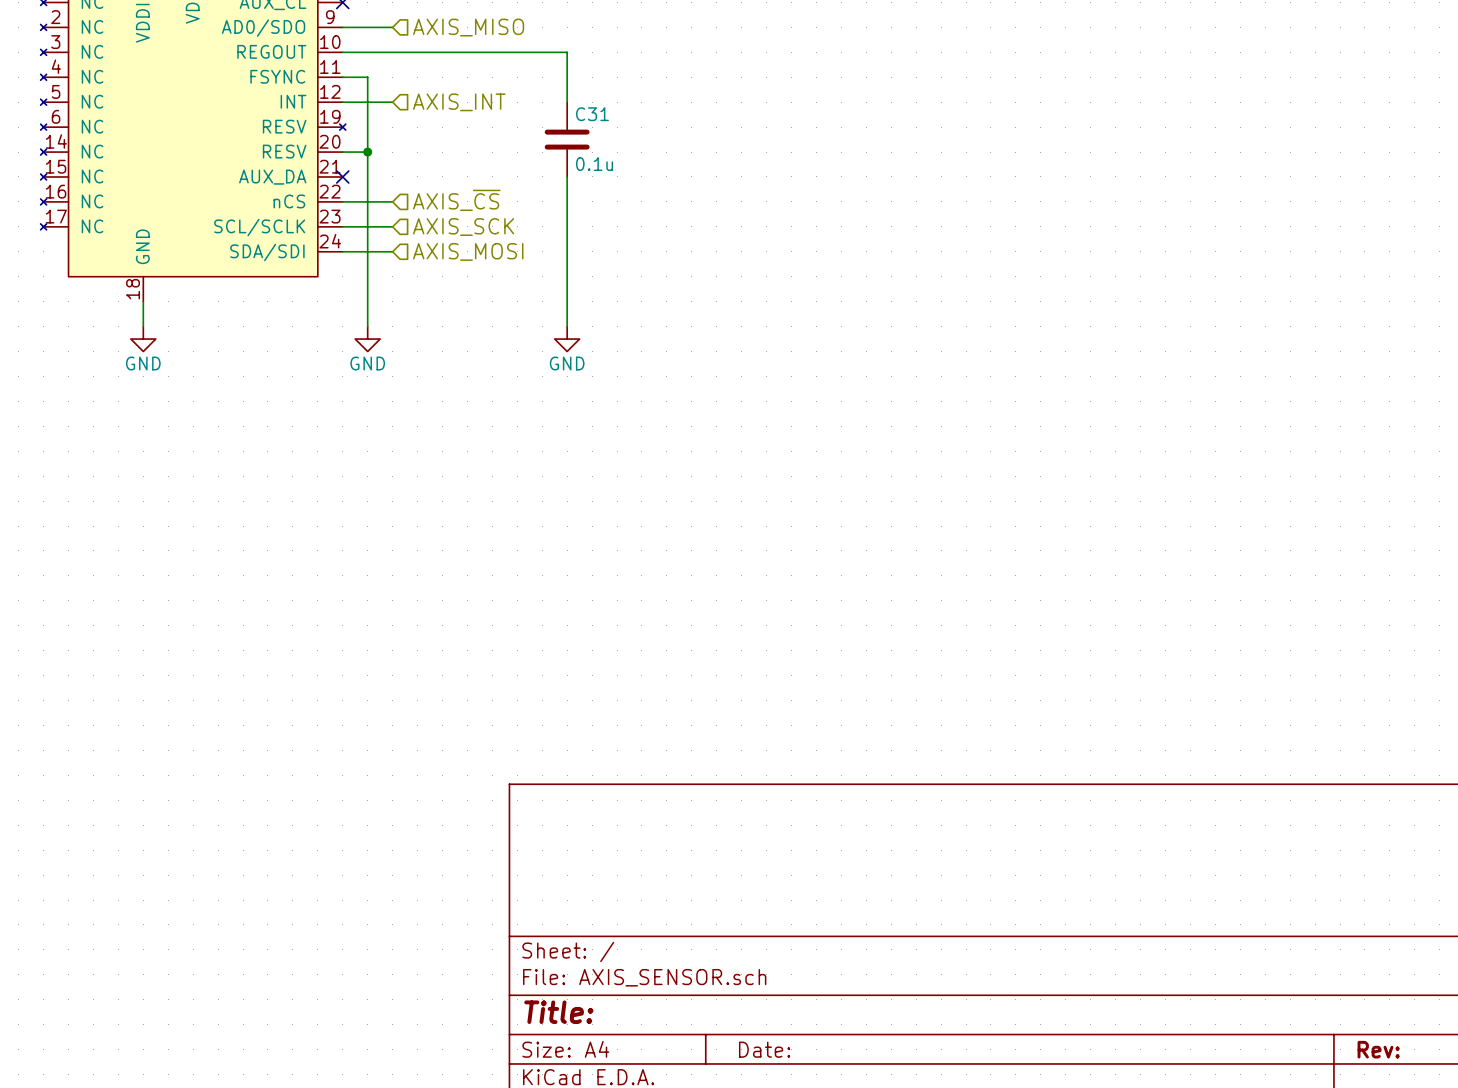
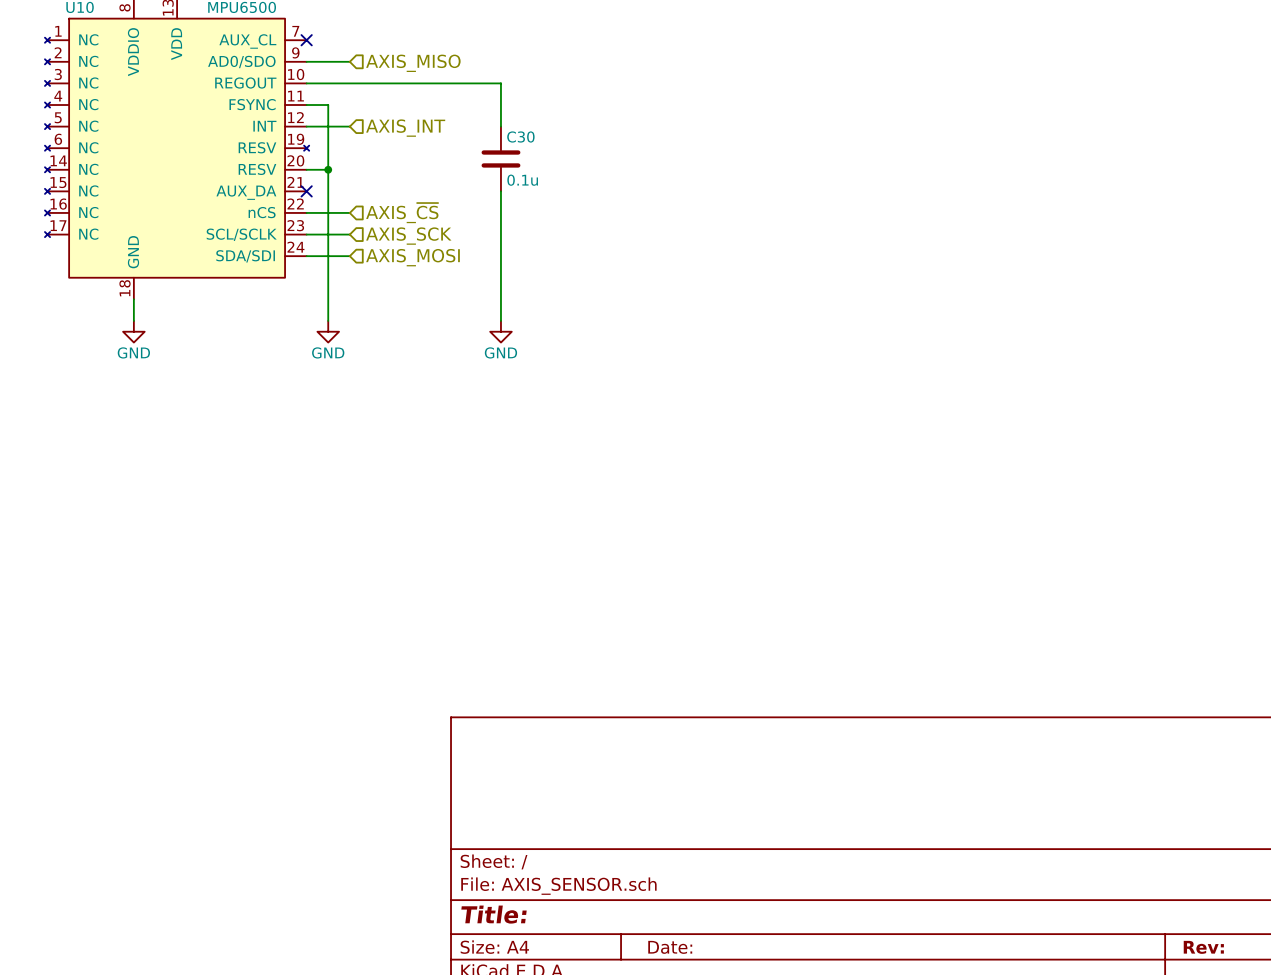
C31 name: C31 (592, 114) -> C30 (520, 136)

